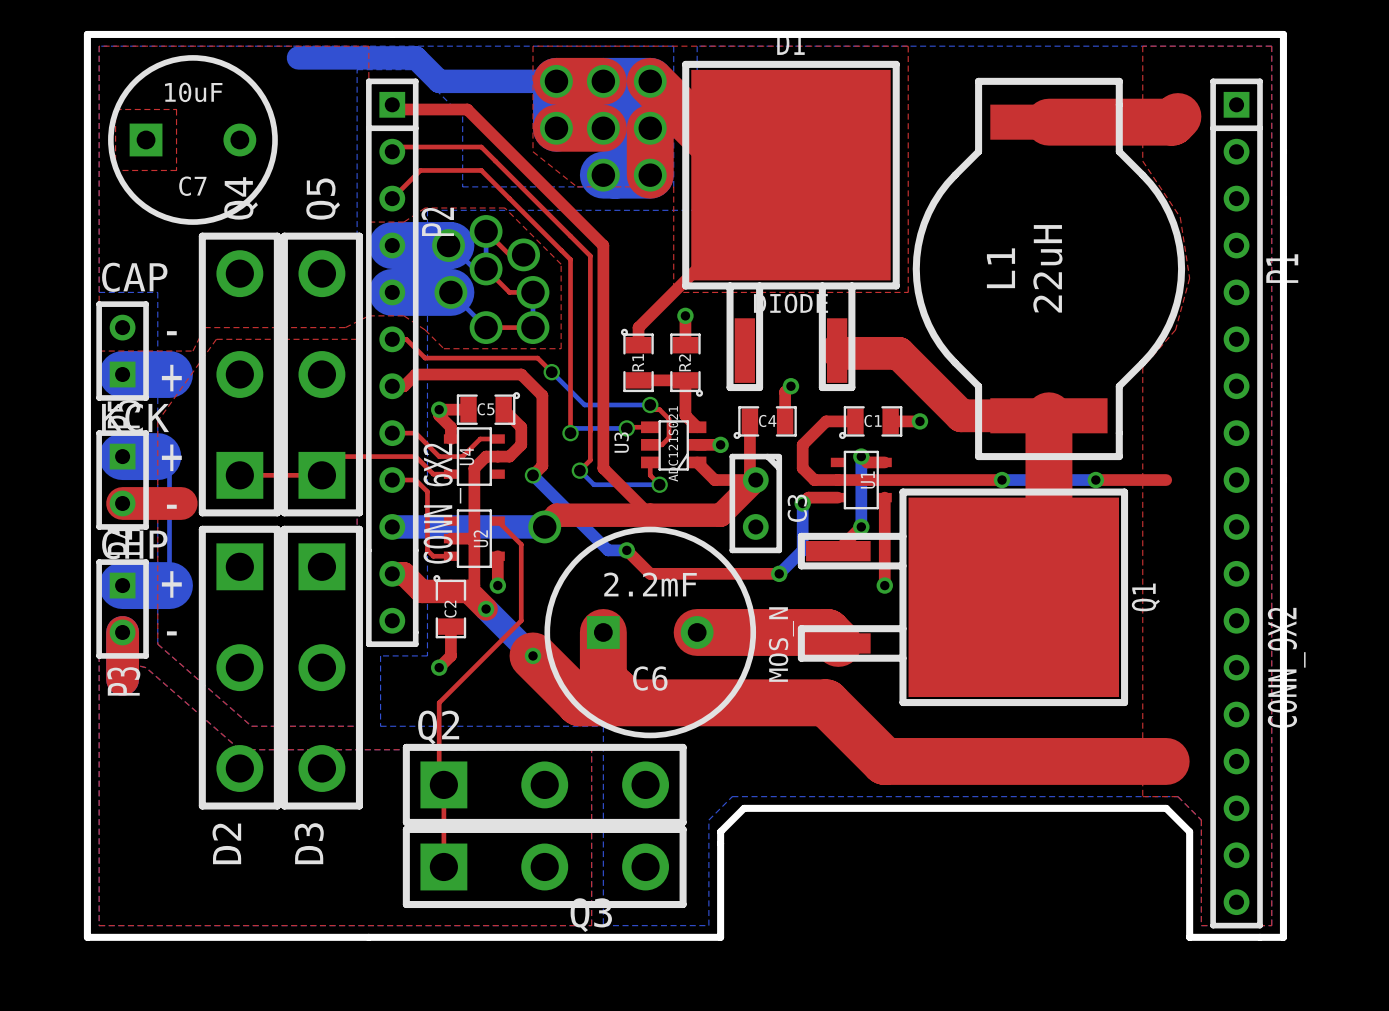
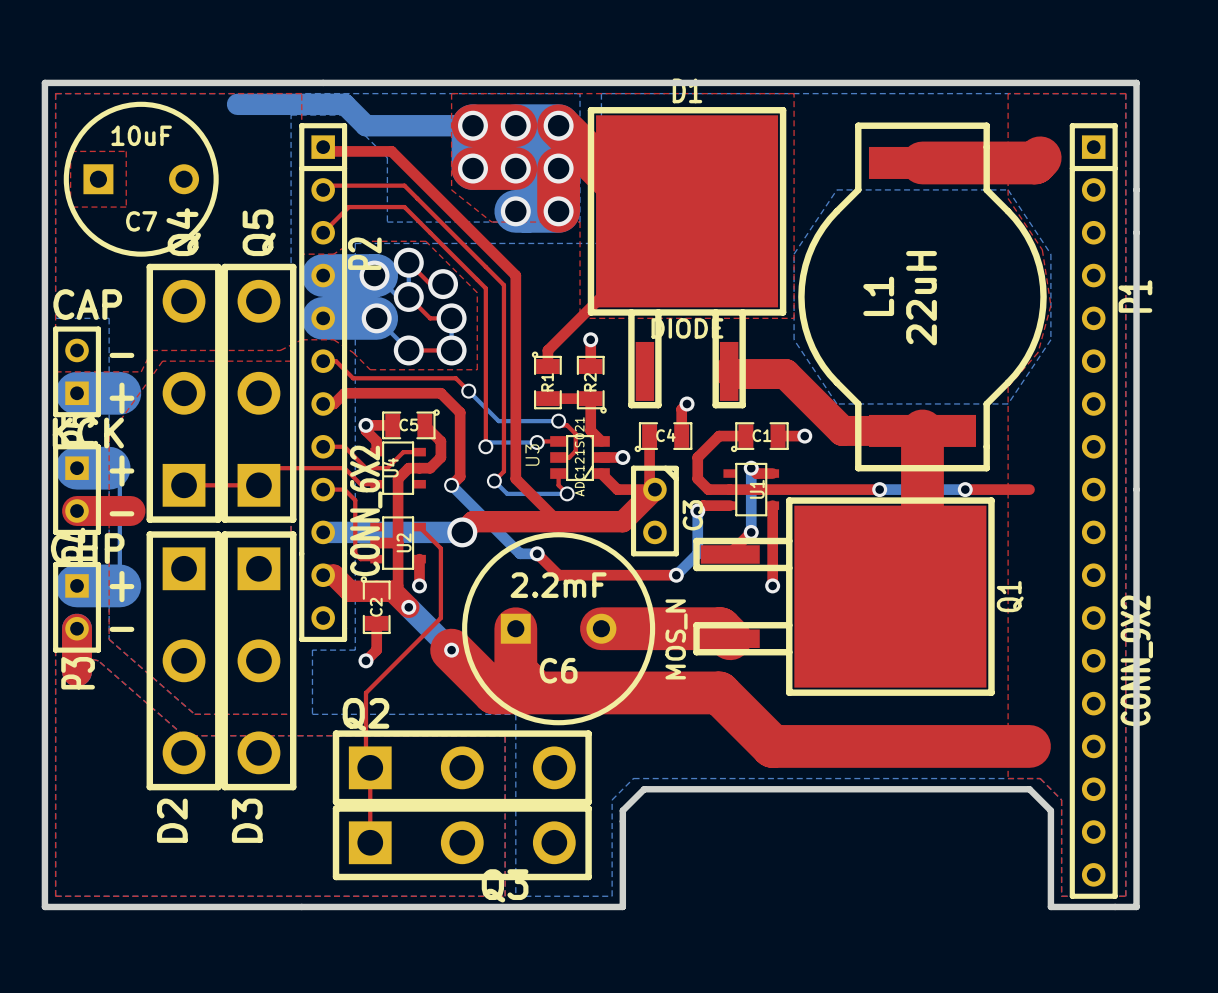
bottom zone outline: none -> (836, 189) (794, 254) (794, 339) (836, 403) (1008, 403) (1050, 339) (1050, 254) (1008, 189) (836, 189)

